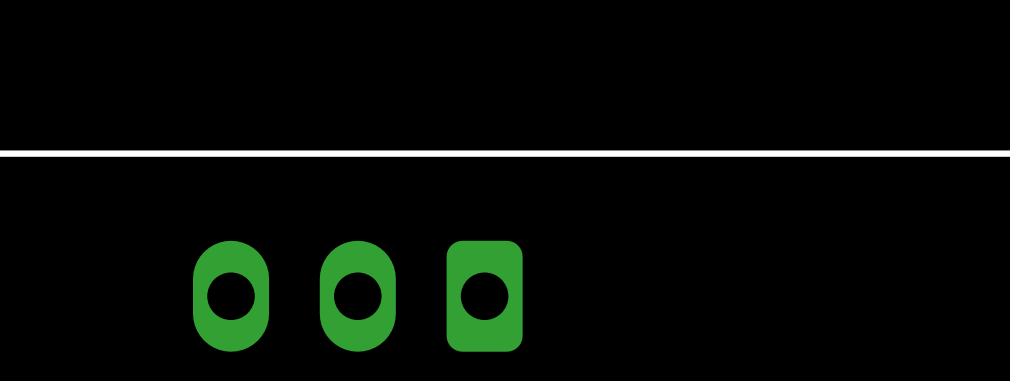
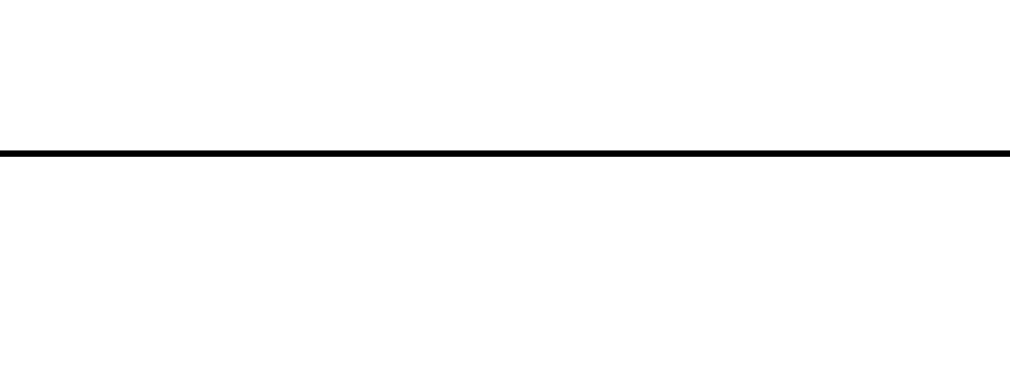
part: (357, 296) -> none

